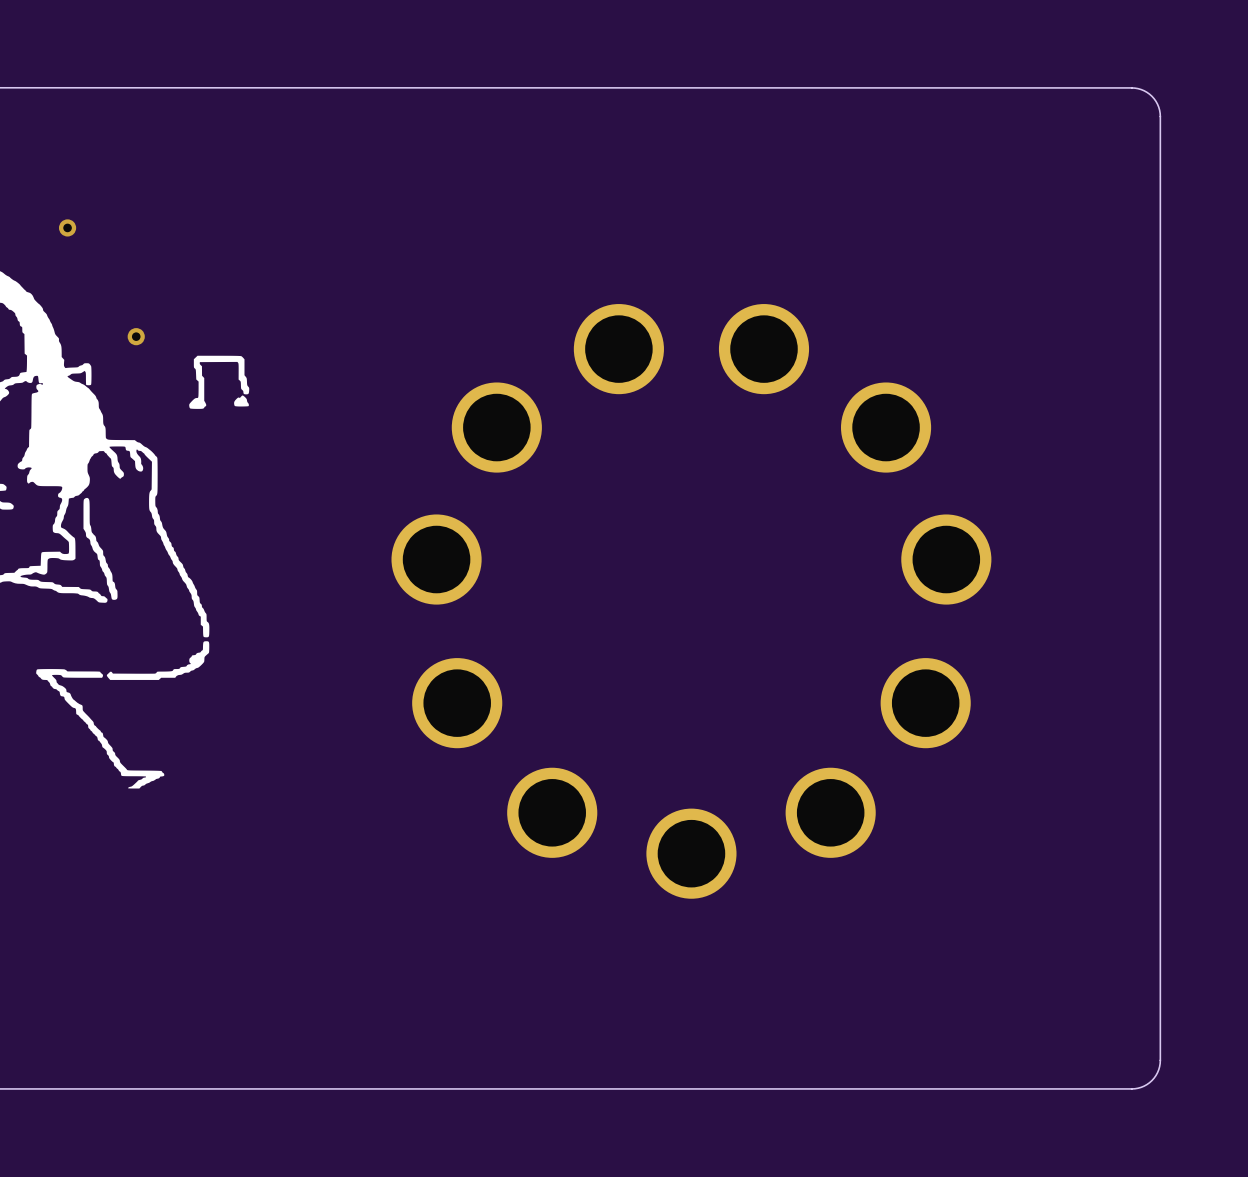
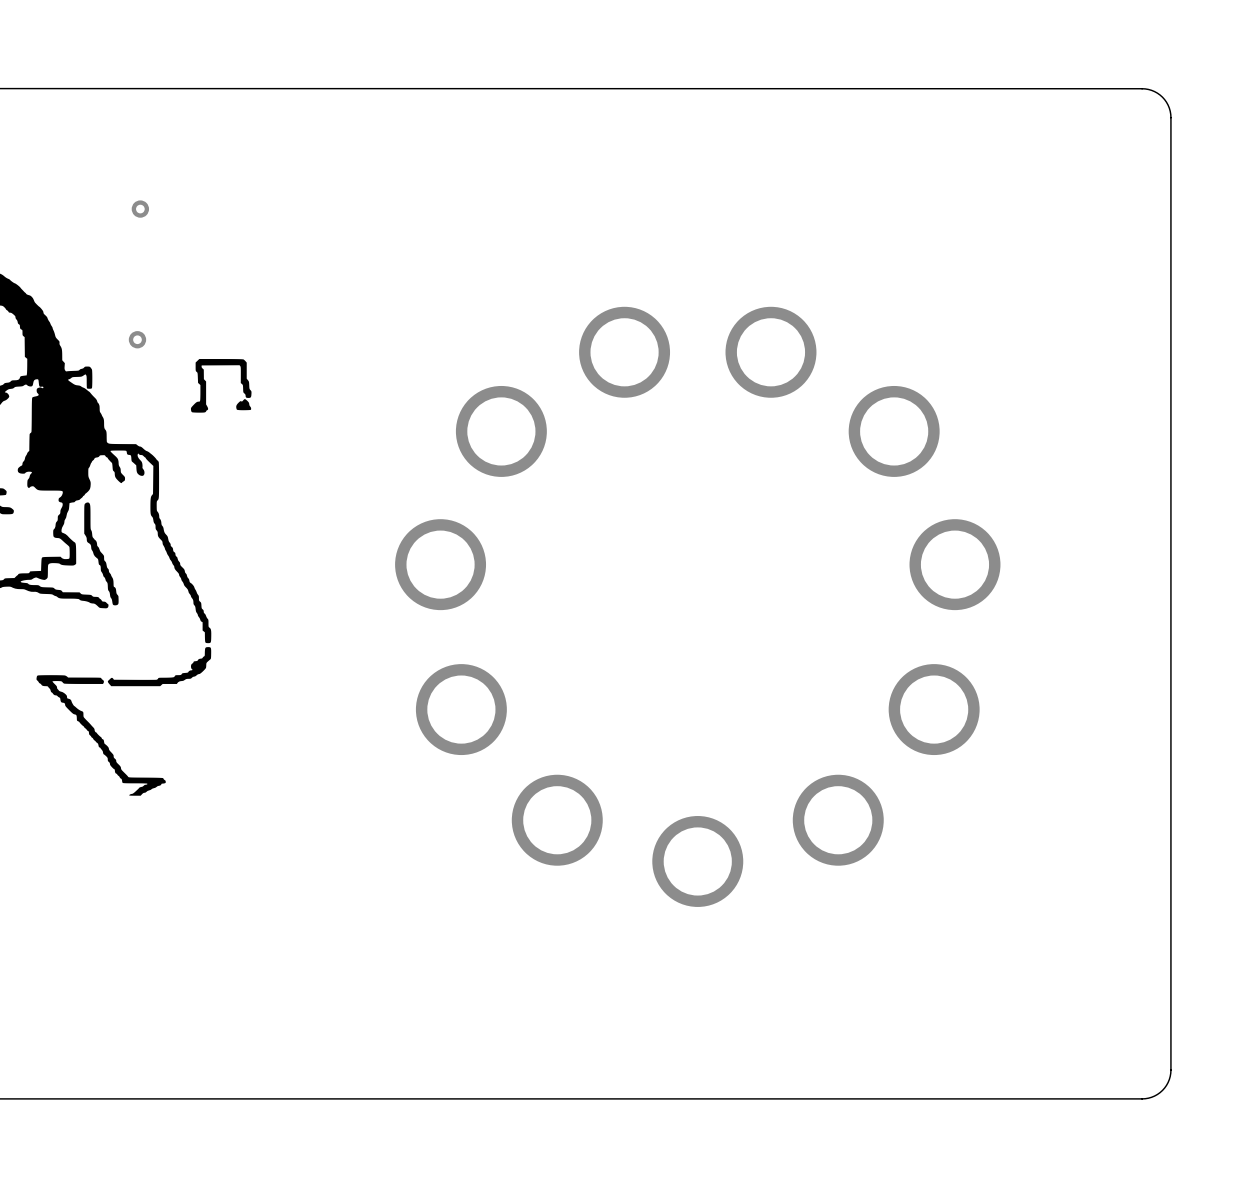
via position: (67, 227) -> (140, 209)

